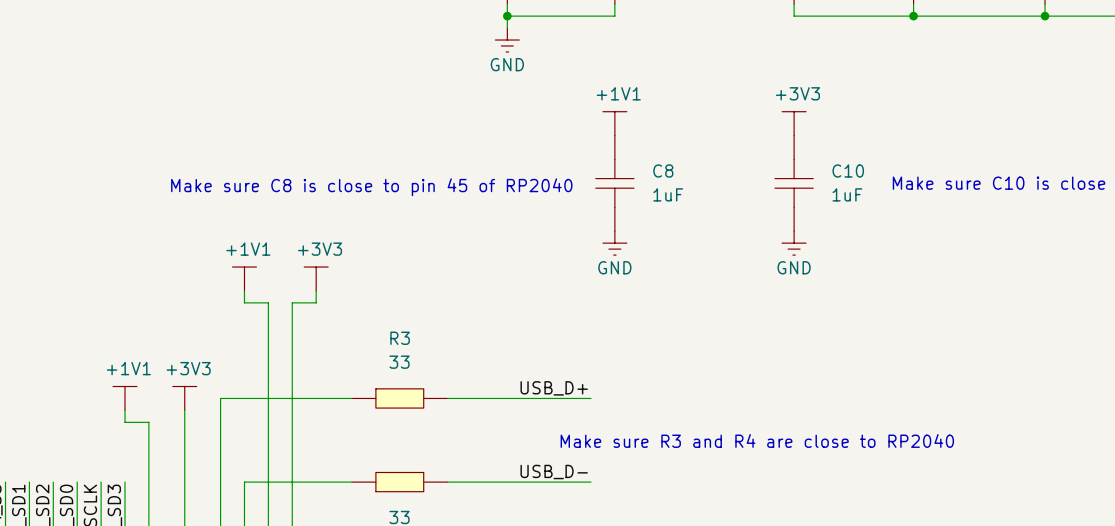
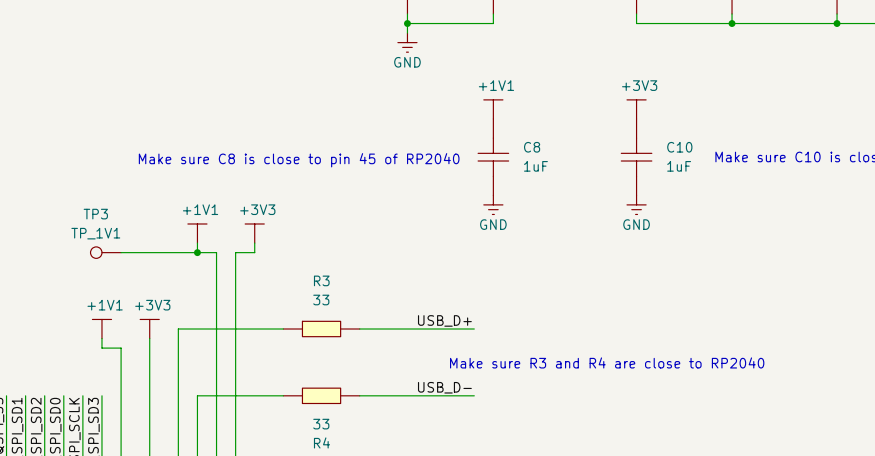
TP3: none -> TP_1V1 (105, 252)
wire: none -> (121, 252) (197, 252)
junction: none -> (197, 252)

